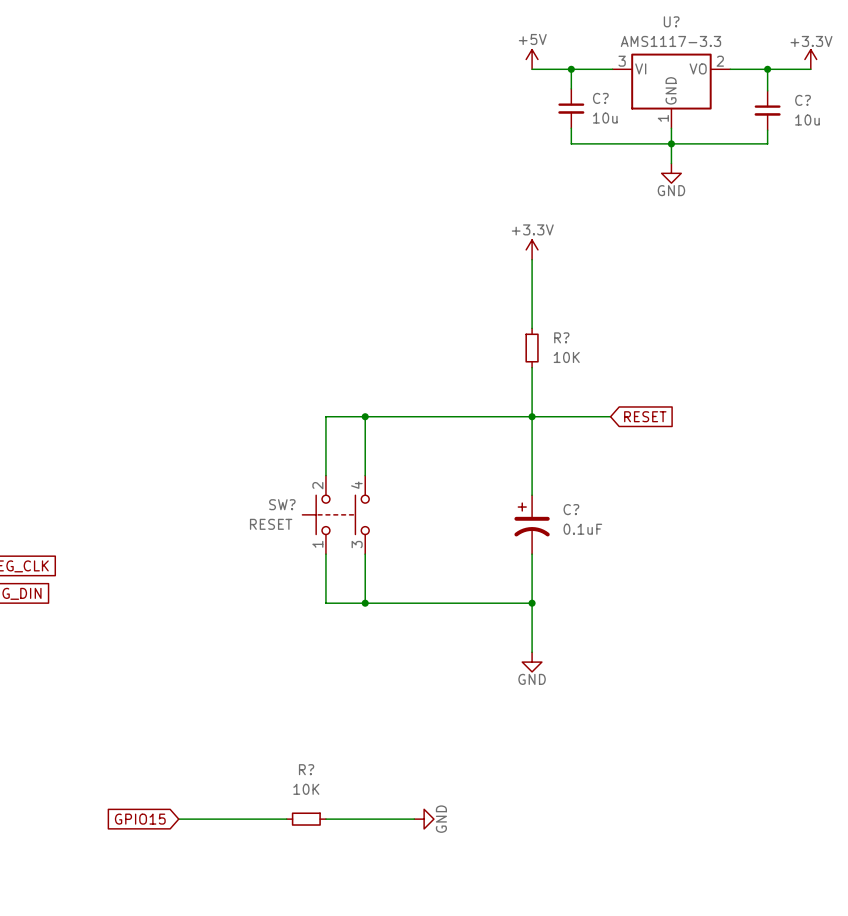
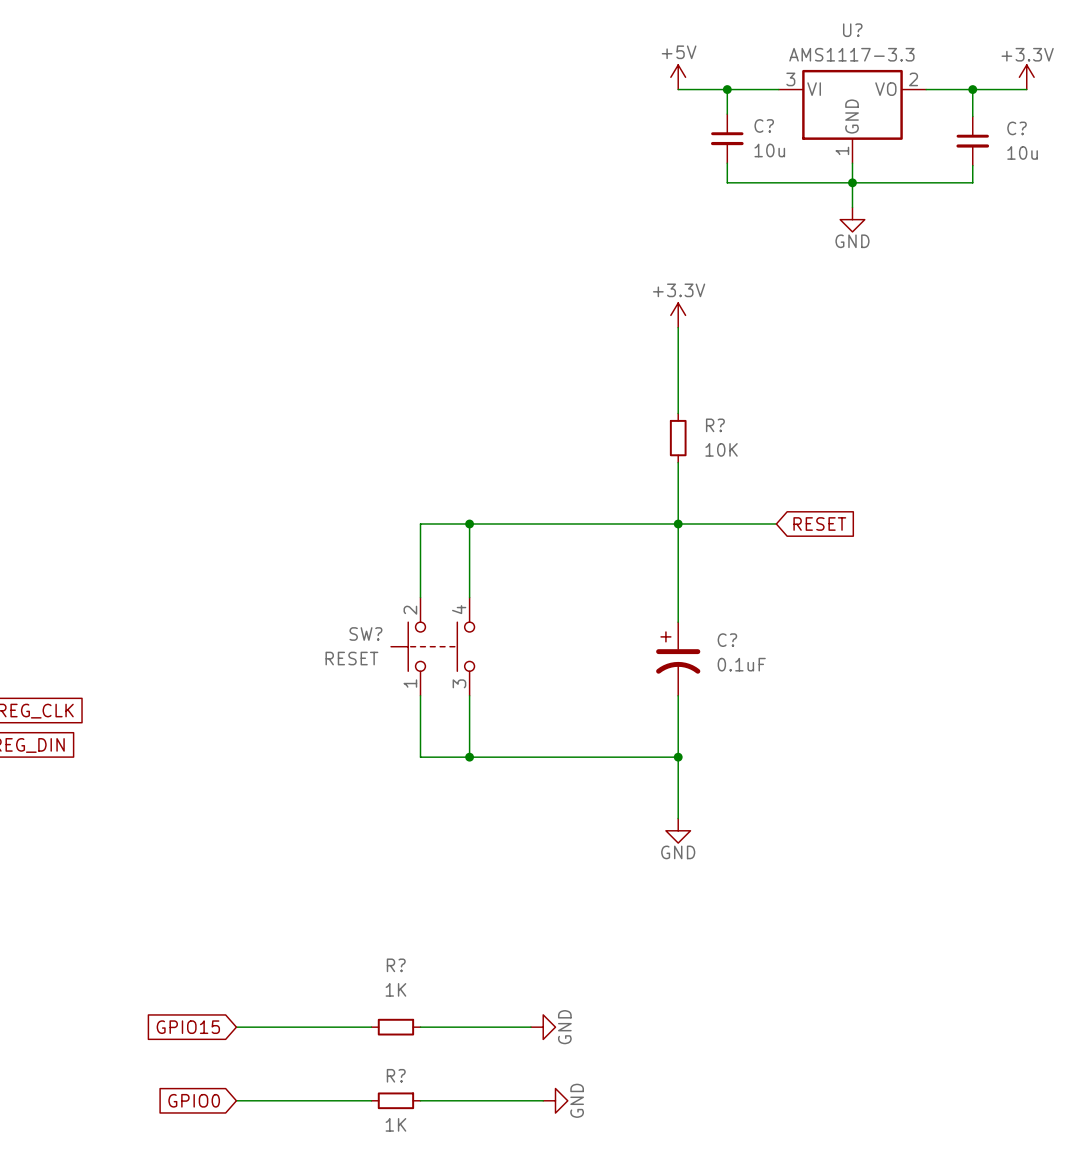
R? value: 10K (306, 789) -> 1K (395, 989)
global label: none -> GPIO0 (194, 1100)
wire: none -> (236, 1100) (371, 1100)
R?: none -> 1K (395, 1100)
wire: none -> (420, 1100) (543, 1100)
power symbol: none -> GND (555, 1100)

